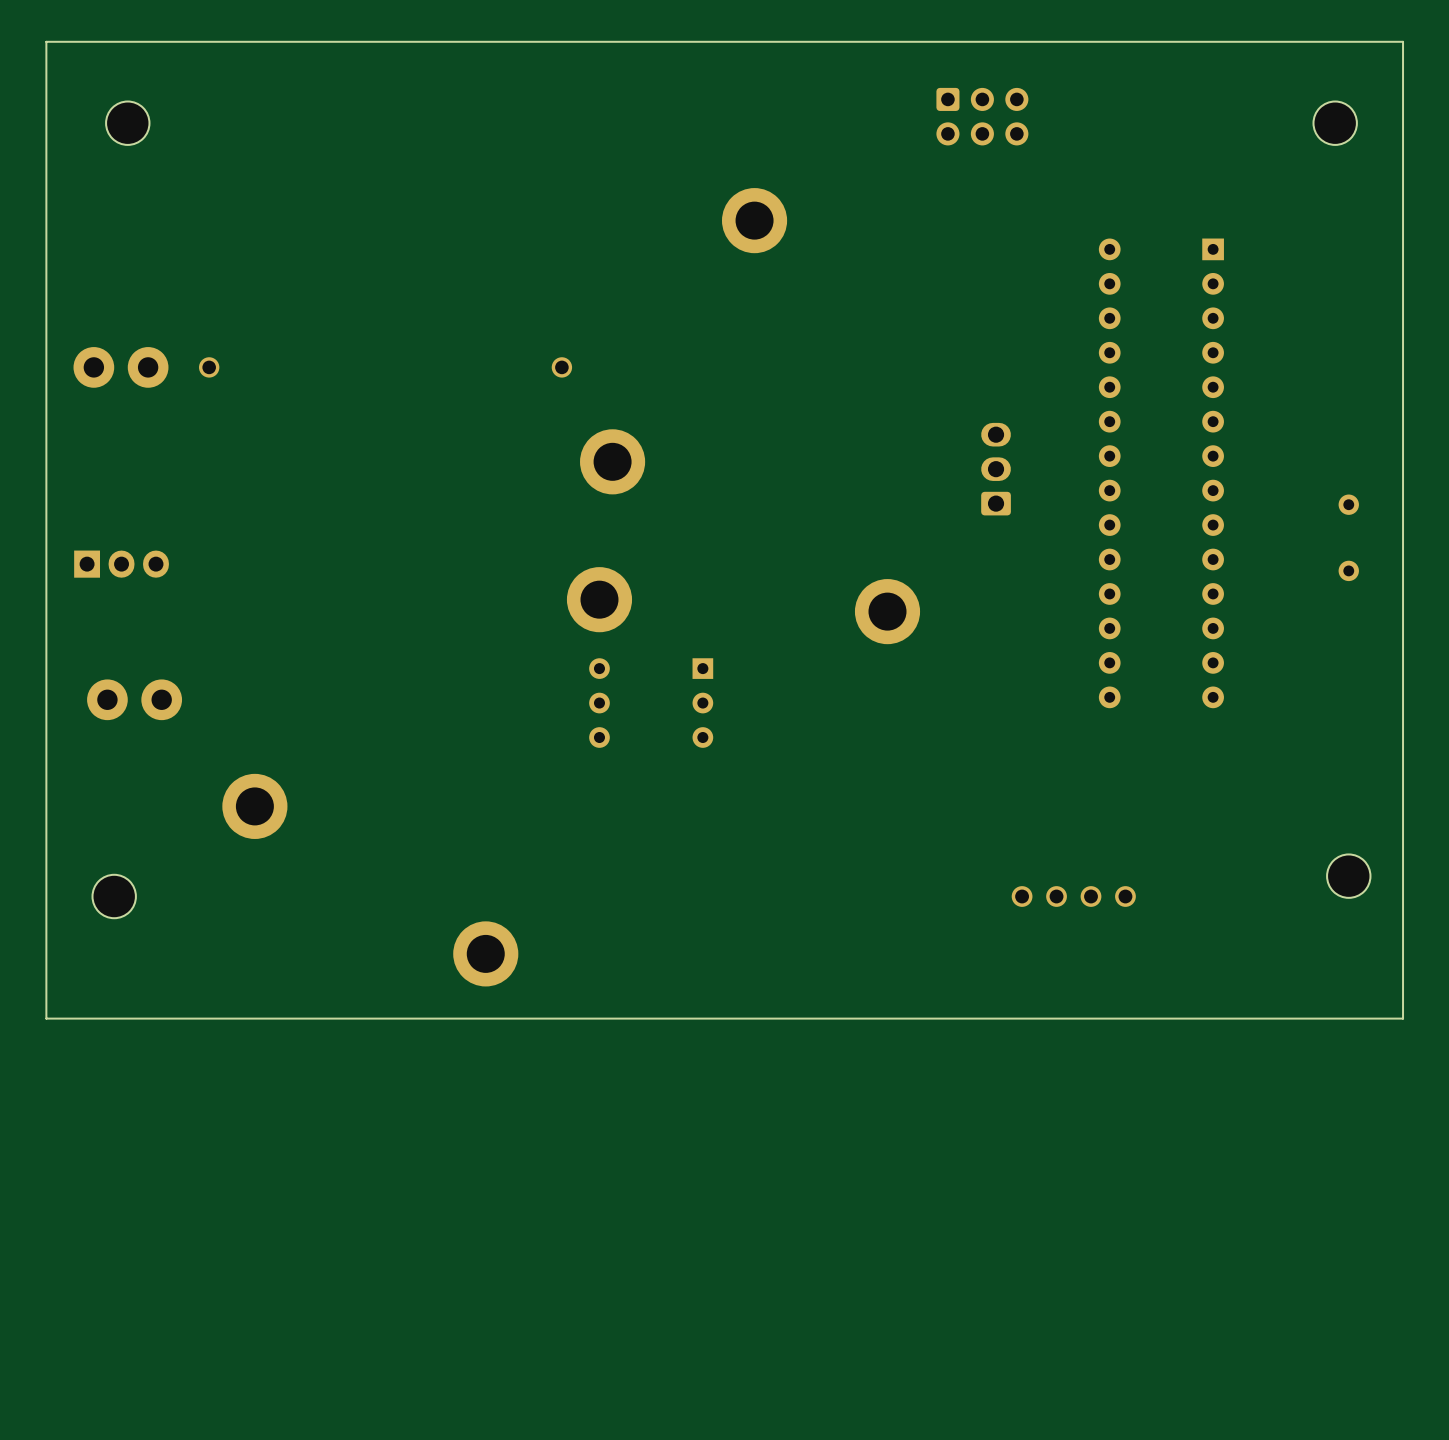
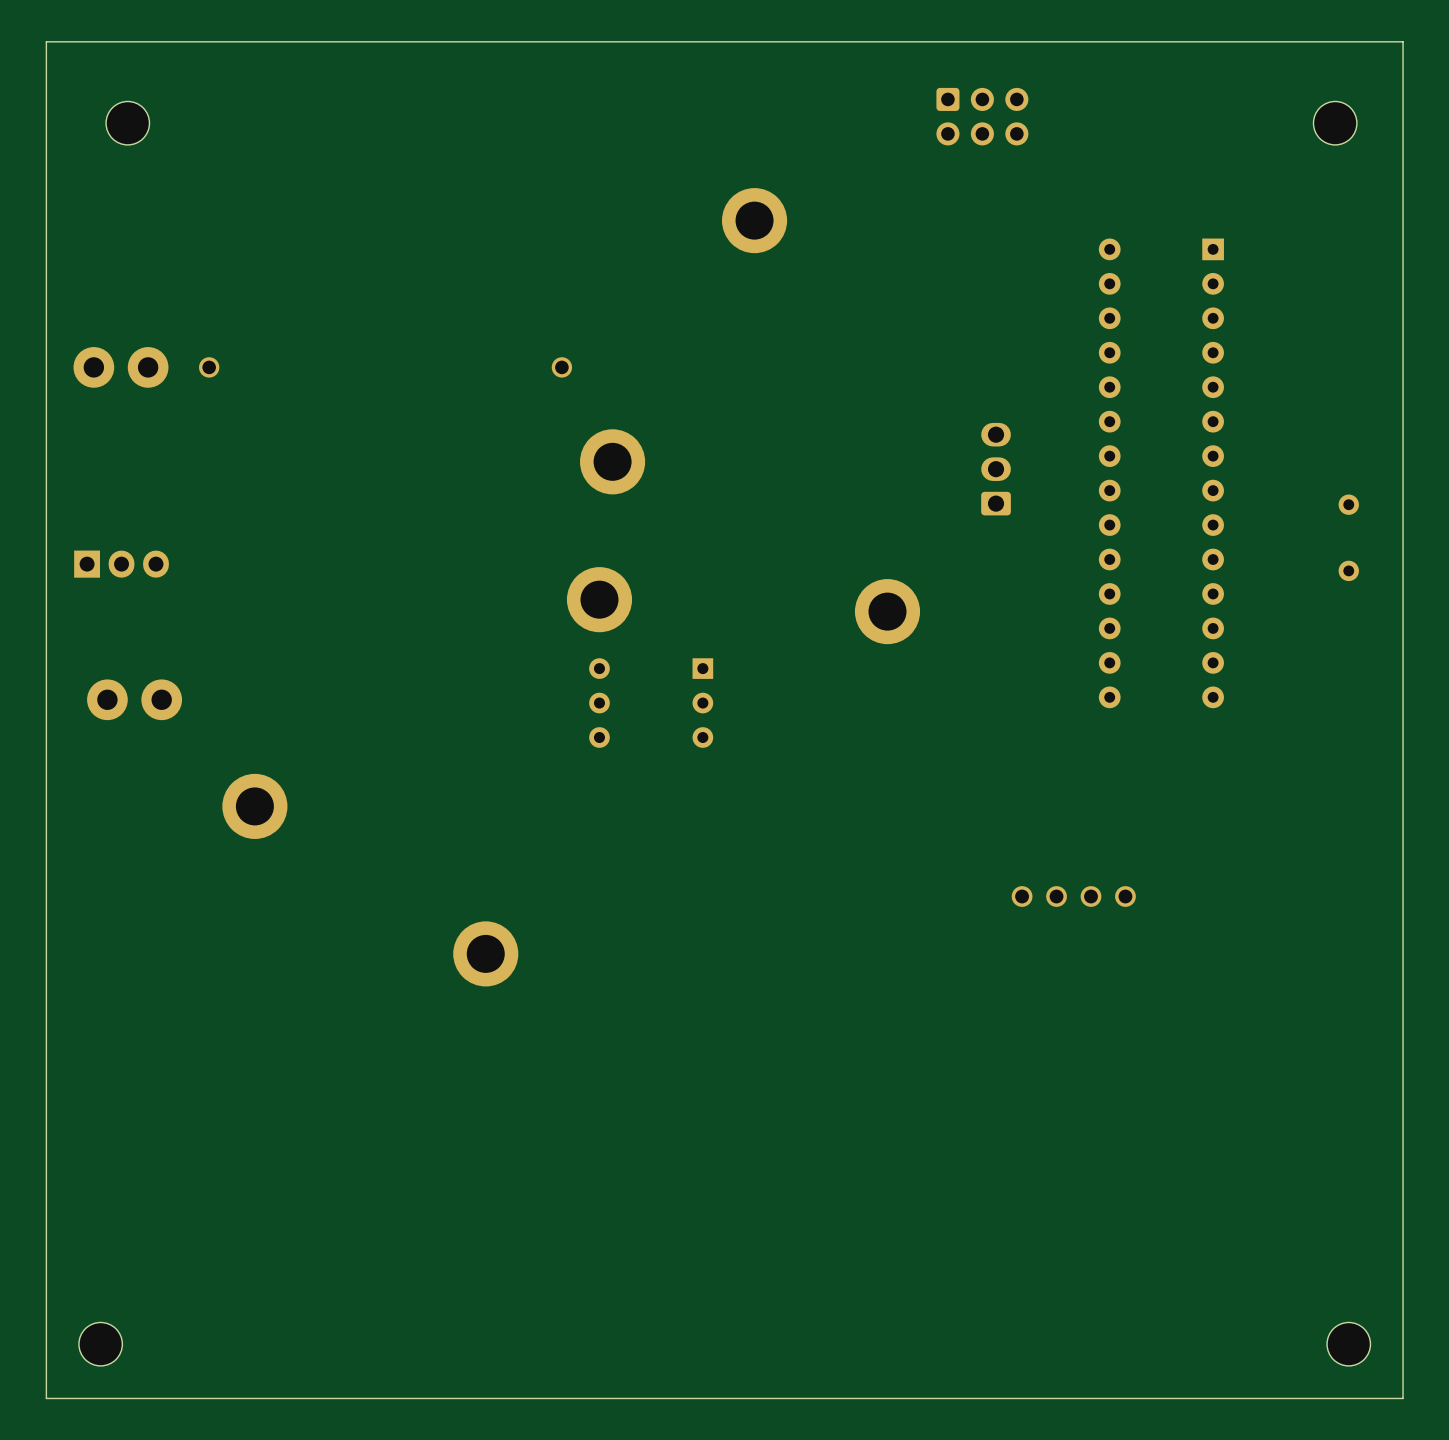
part: (1348, 876) -> none
part: (114, 896) -> none
board edge: (1403, 1018) (46, 1018) -> (1403, 1018) (1403, 1398) (46, 1398) (46, 1018)
part: none -> (100, 1344)
part: none -> (1348, 1344)

